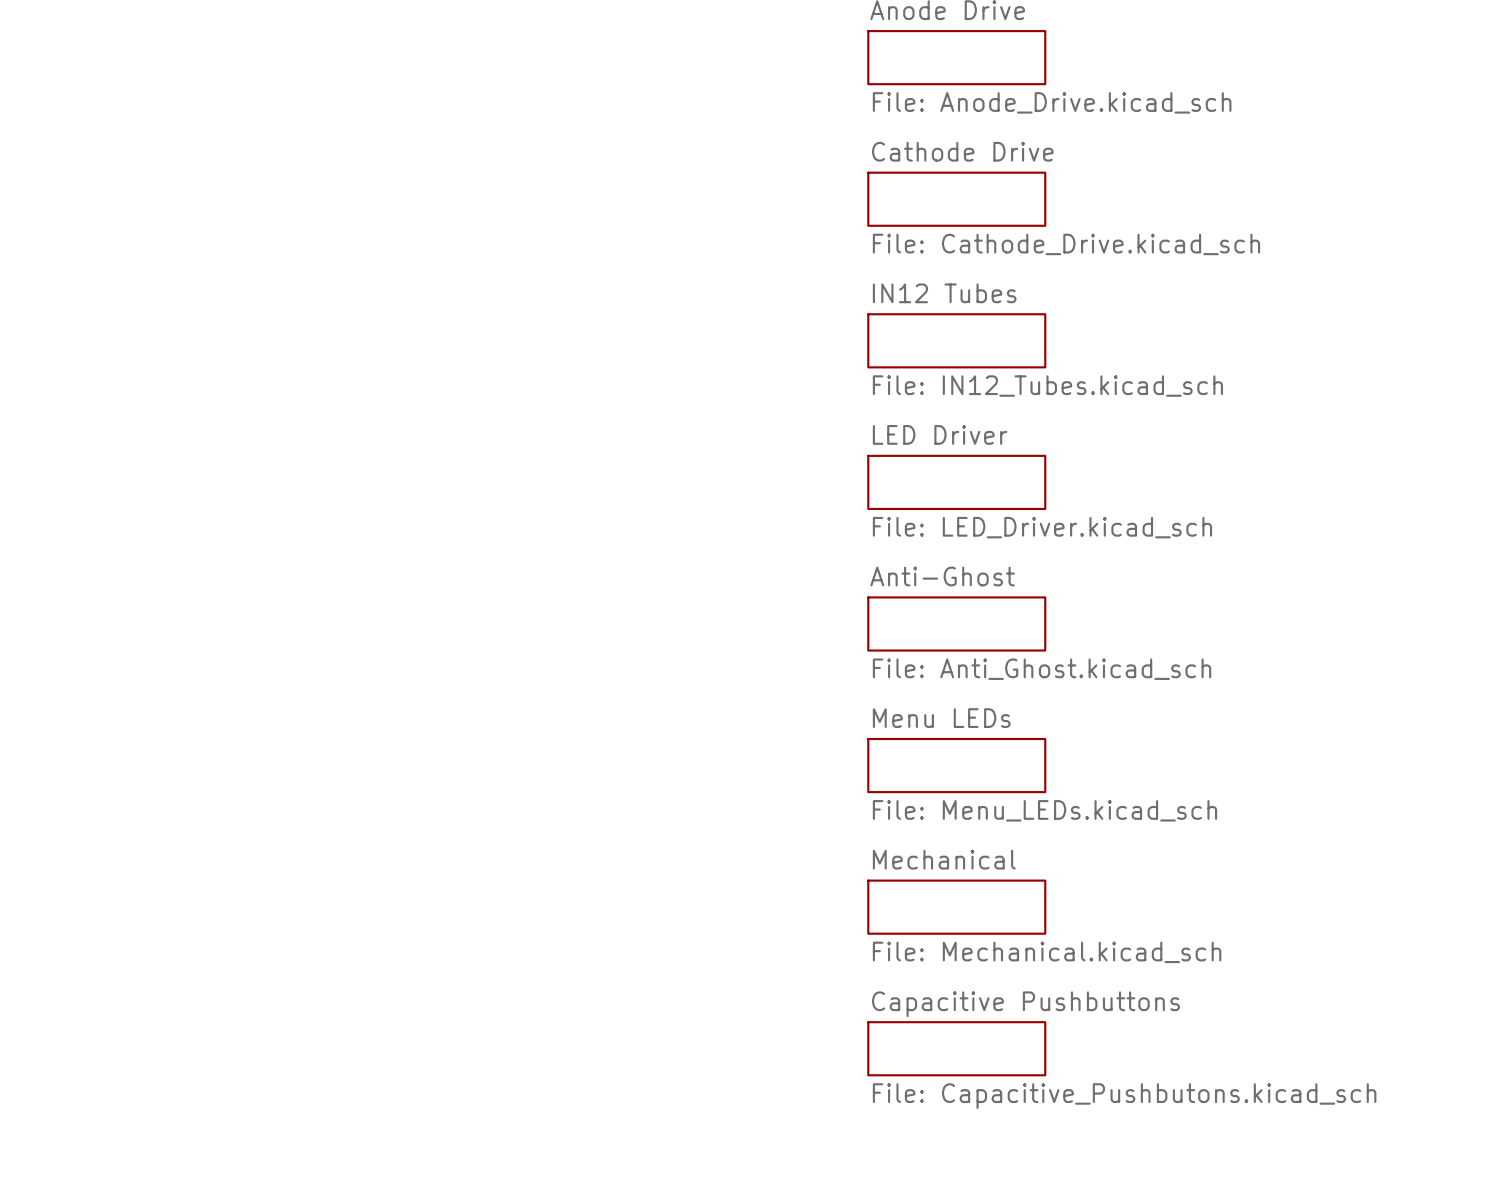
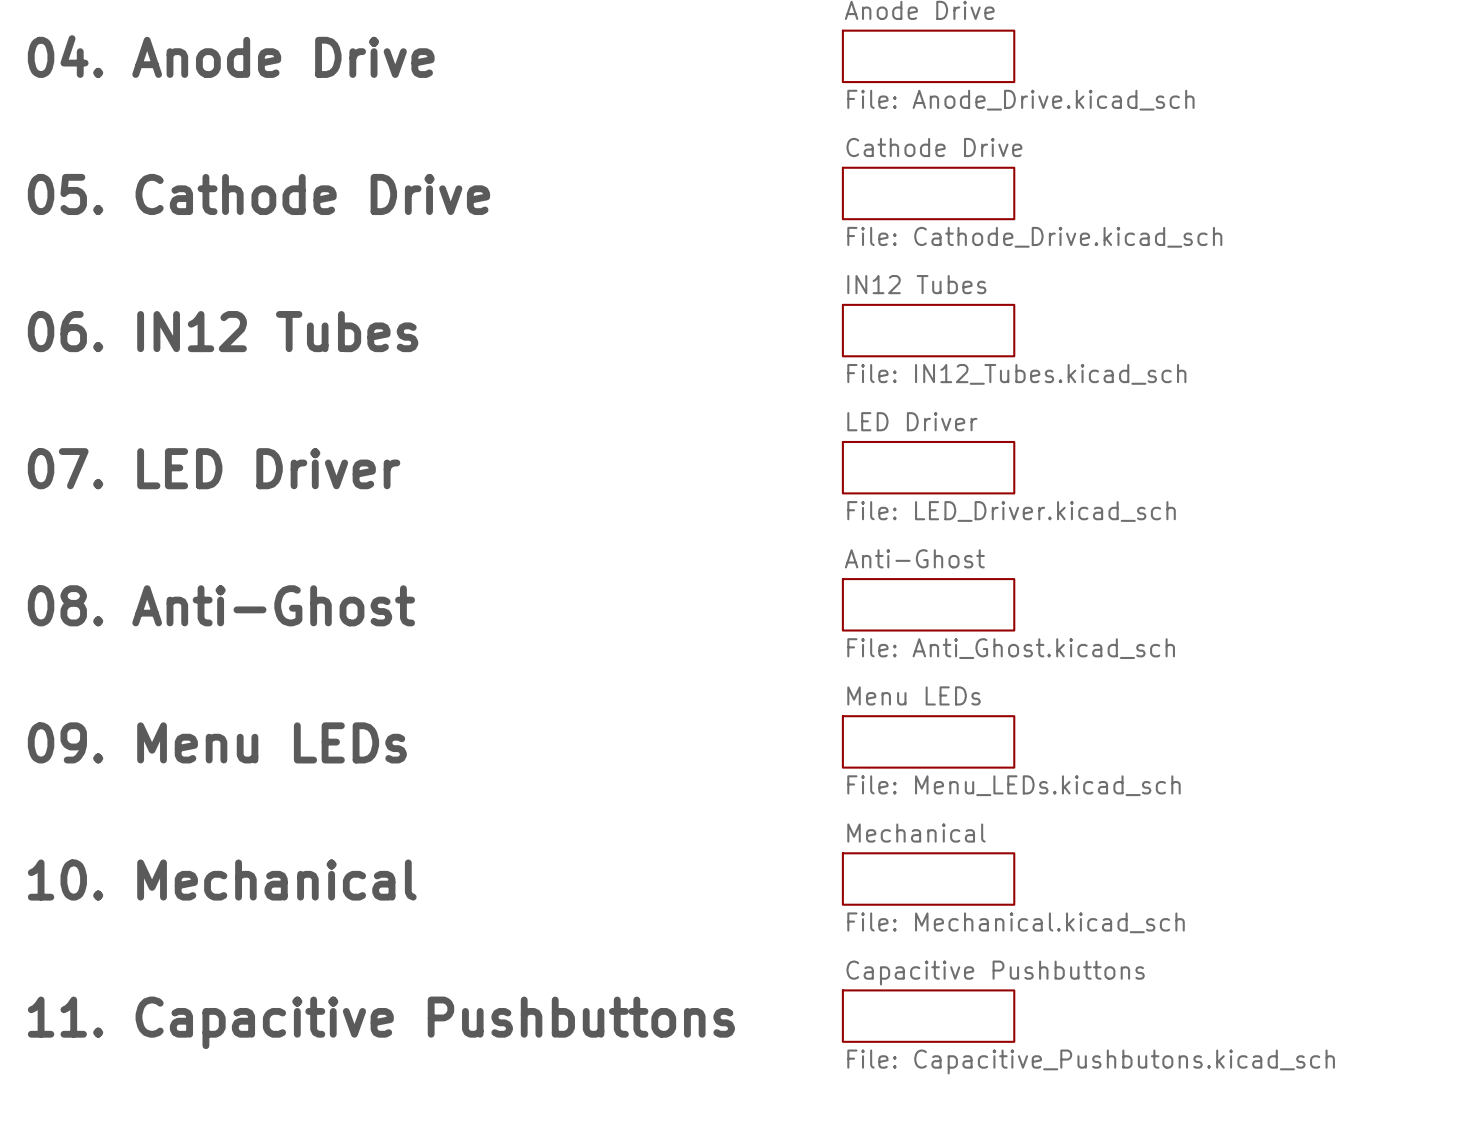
text: none -> 04. Anode Drive (231, 56)
text: none -> 05. Cathode Drive (258, 194)
text: none -> 06. IN12 Tubes (223, 331)
text: none -> 07. LED Driver (214, 468)
text: none -> 08. Anti-Ghost (221, 605)
text: none -> 09. Menu LEDs (217, 742)
text: none -> 10. Mechanical (222, 880)
text: none -> 11. Capacitive Pushbuttons (381, 1022)

